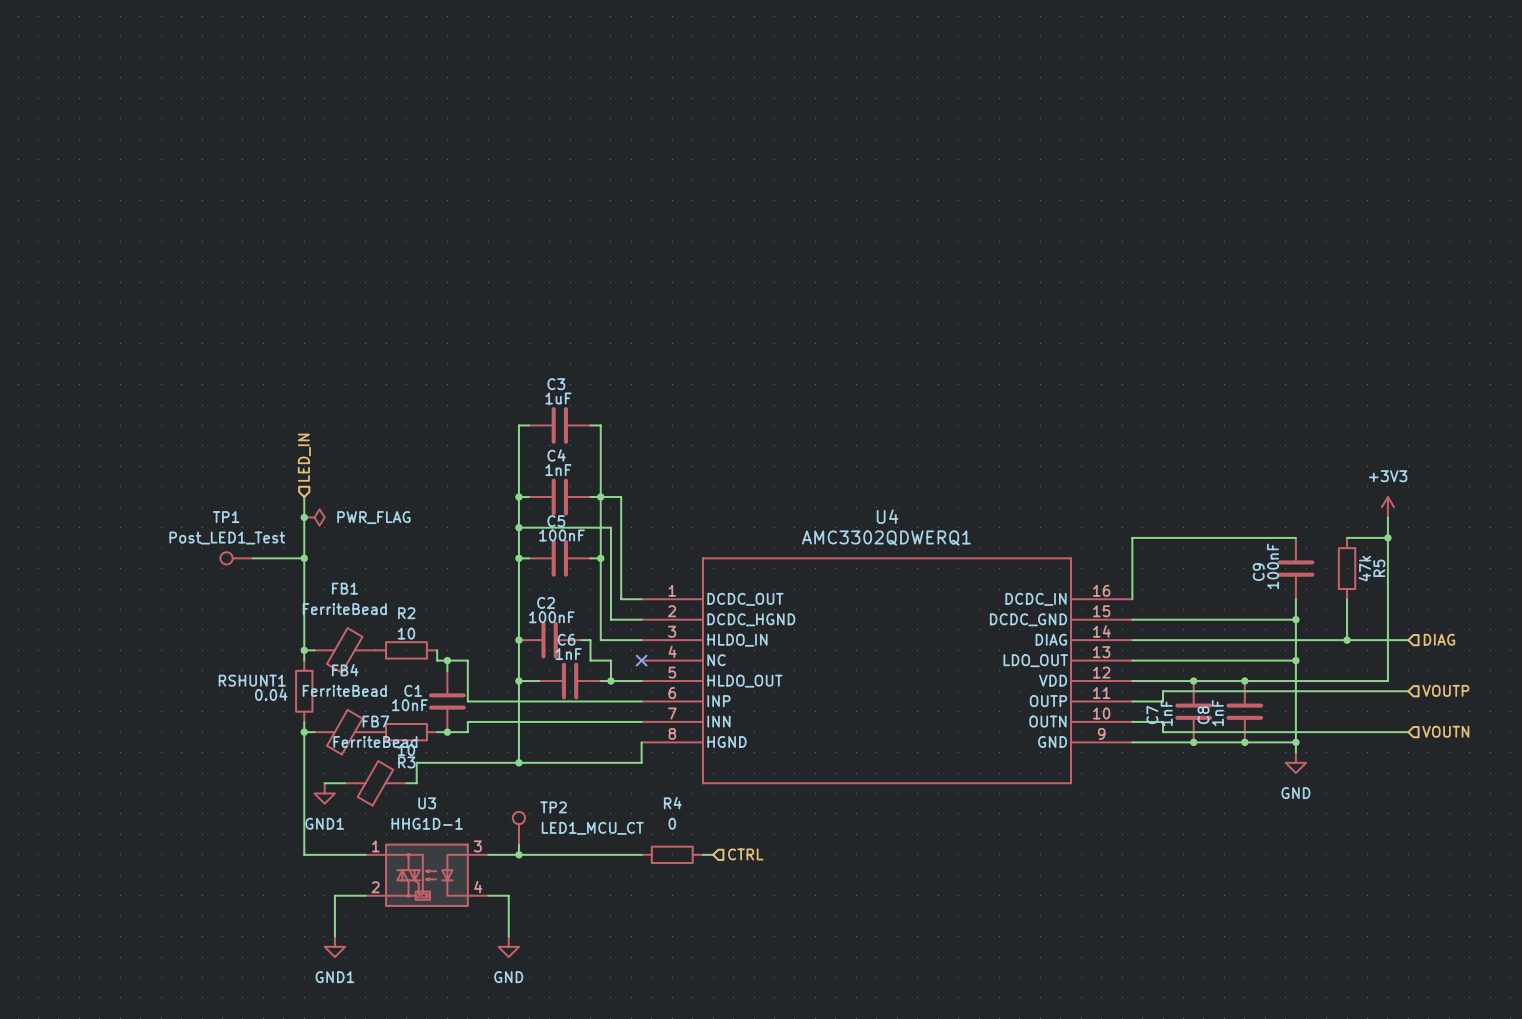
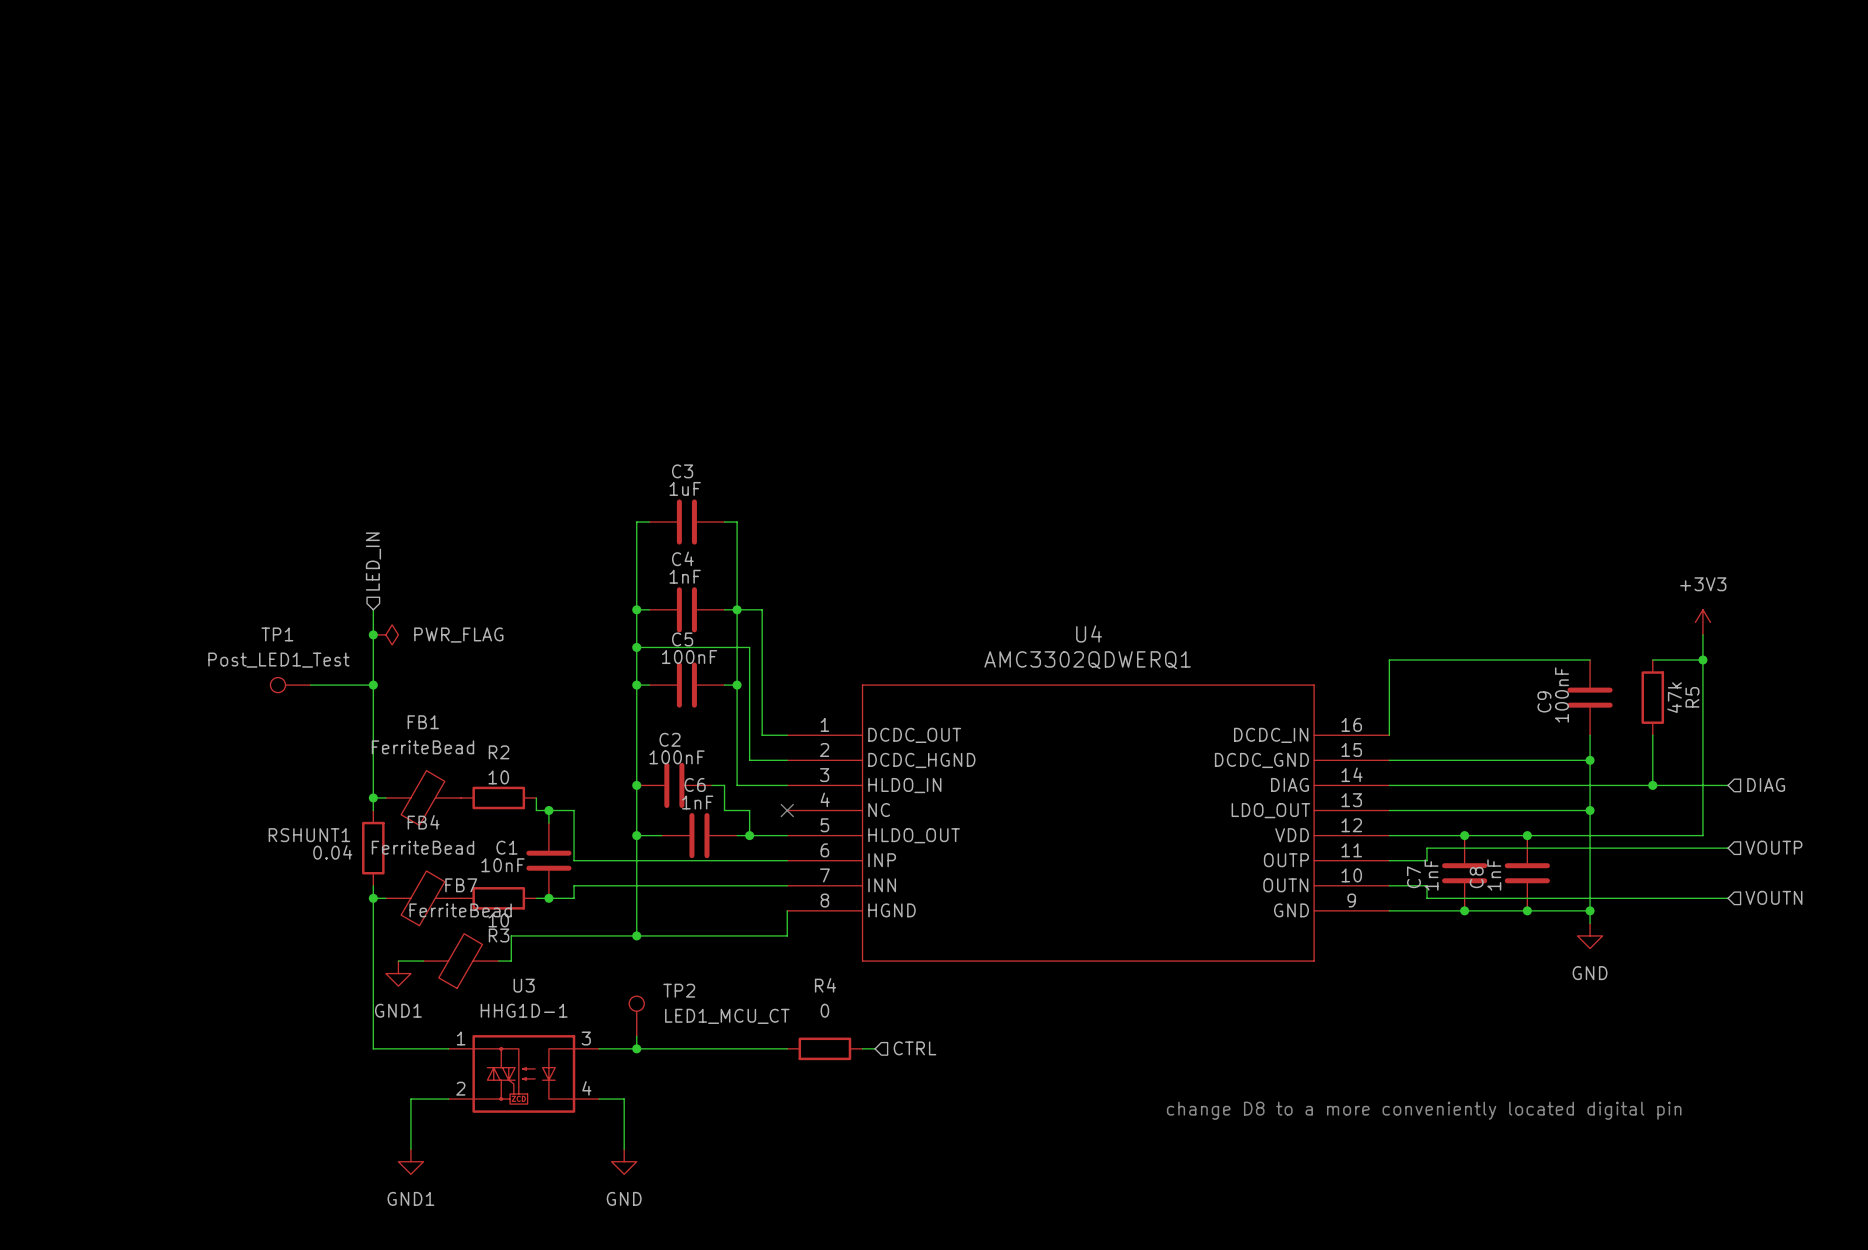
text: none -> change D8 to a more conveniently located digital pin (1424, 1110)

